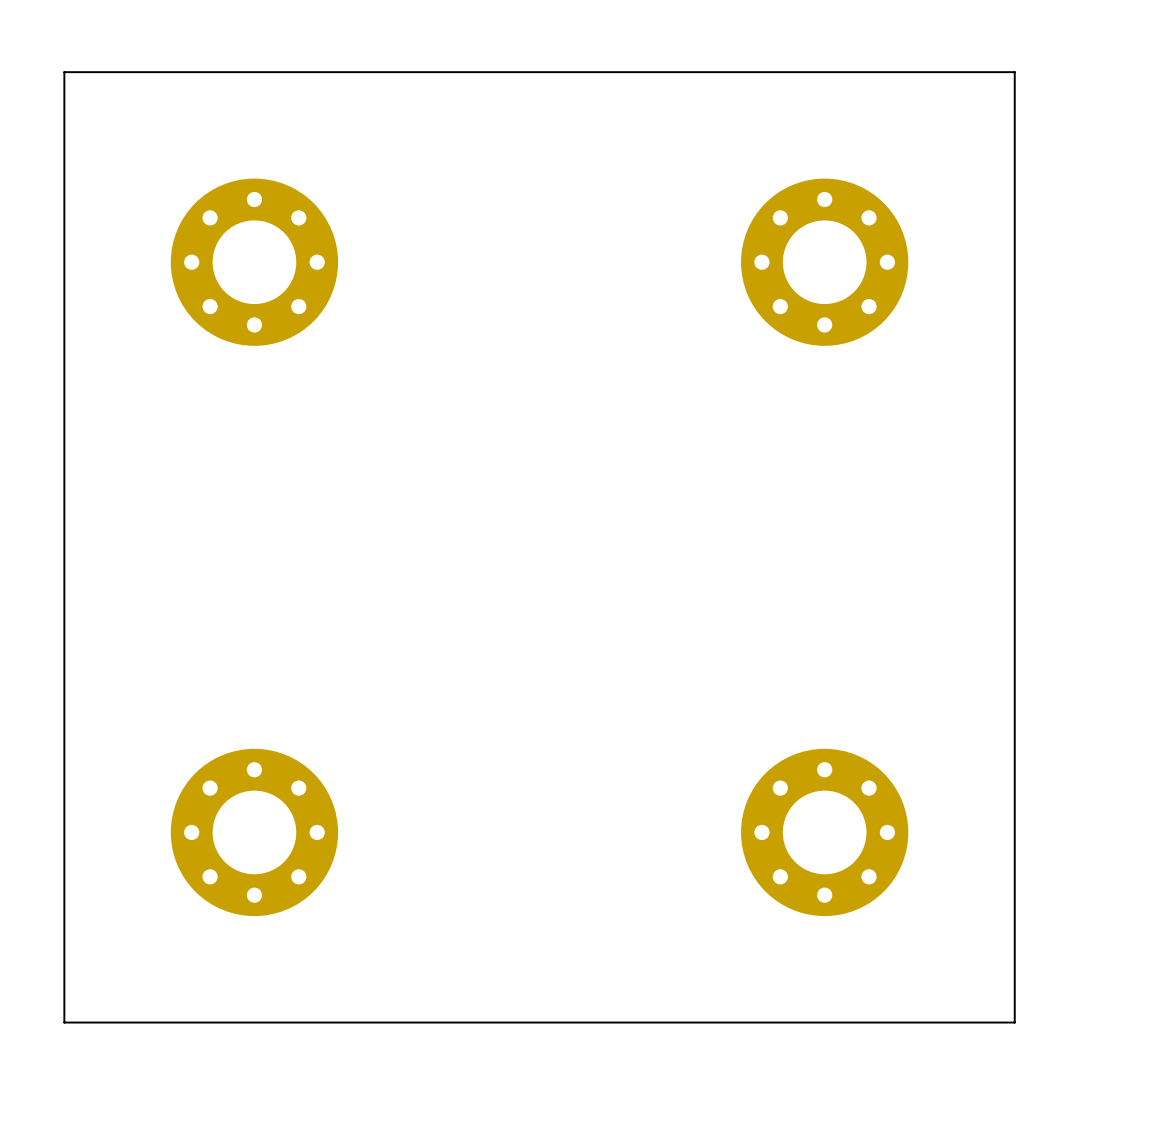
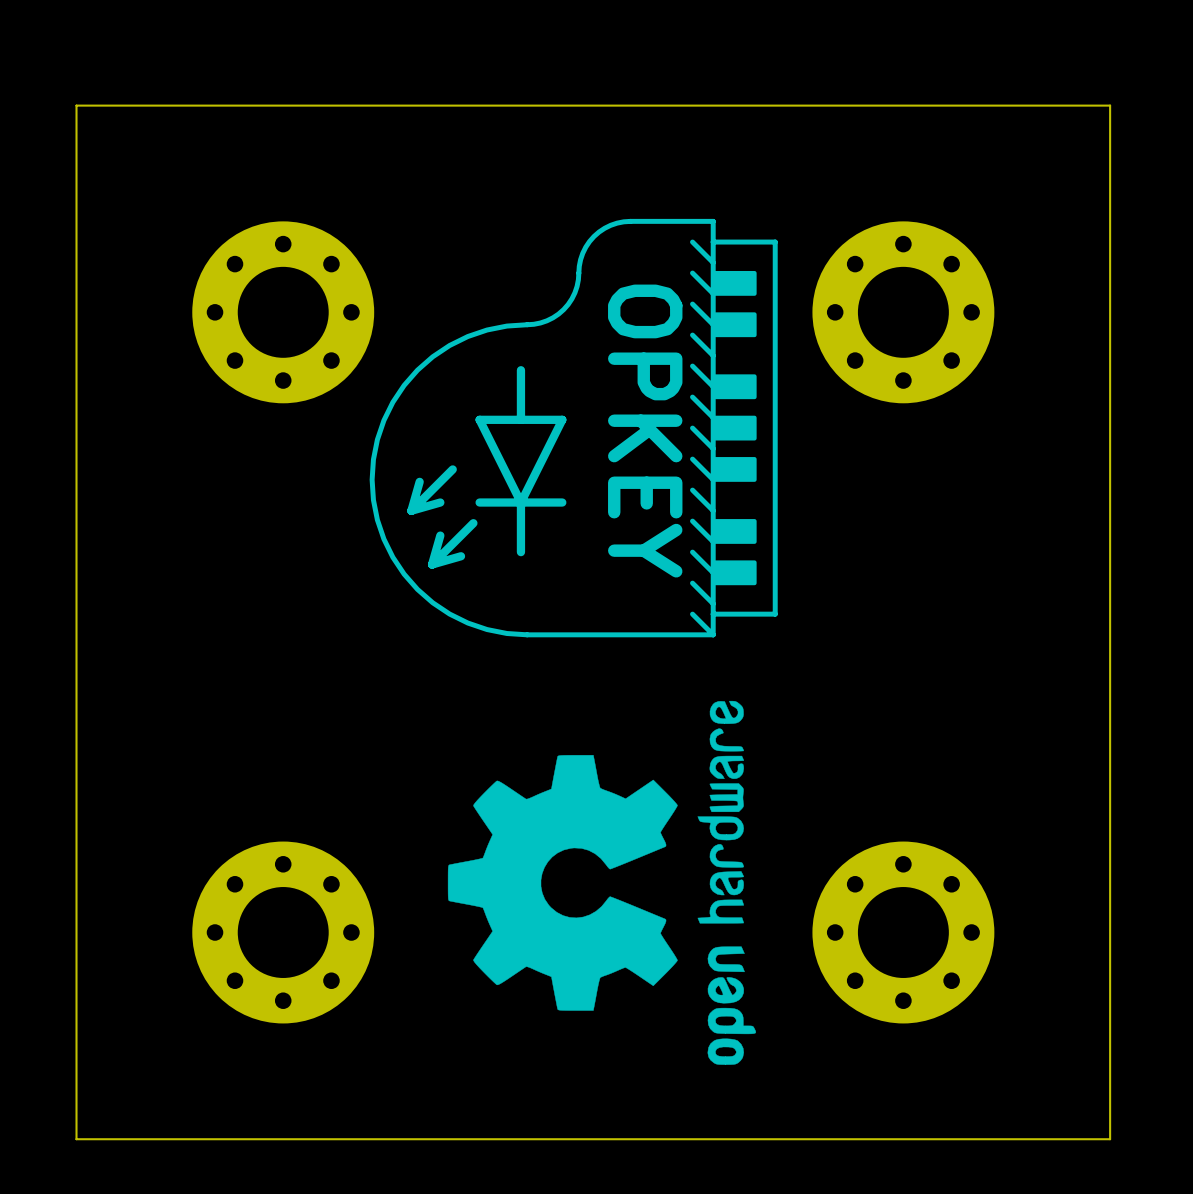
drawing: none -> [369, 218, 778, 638]
drawing: none -> [447, 700, 757, 1065]

